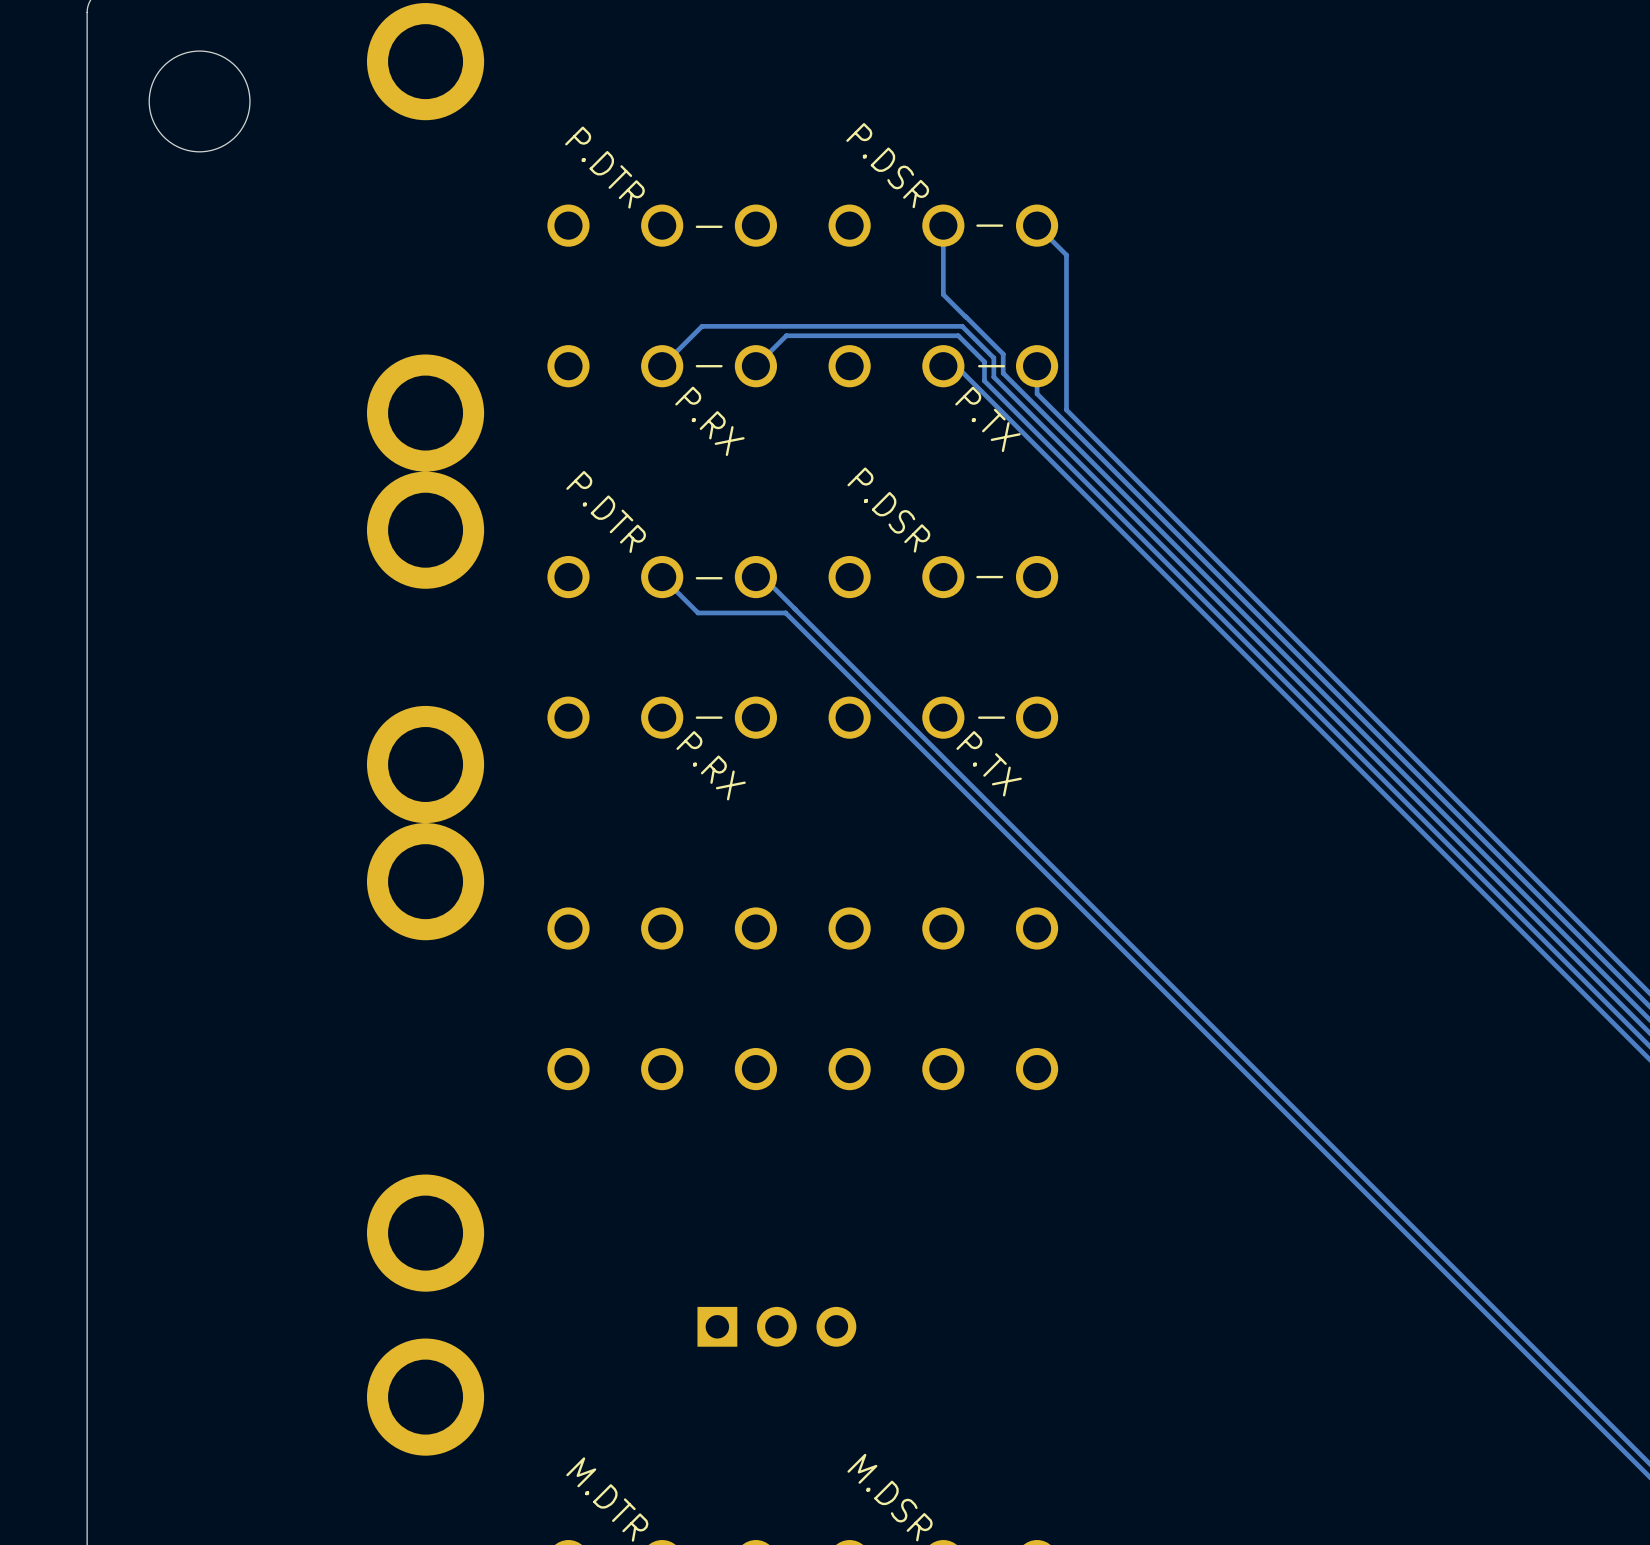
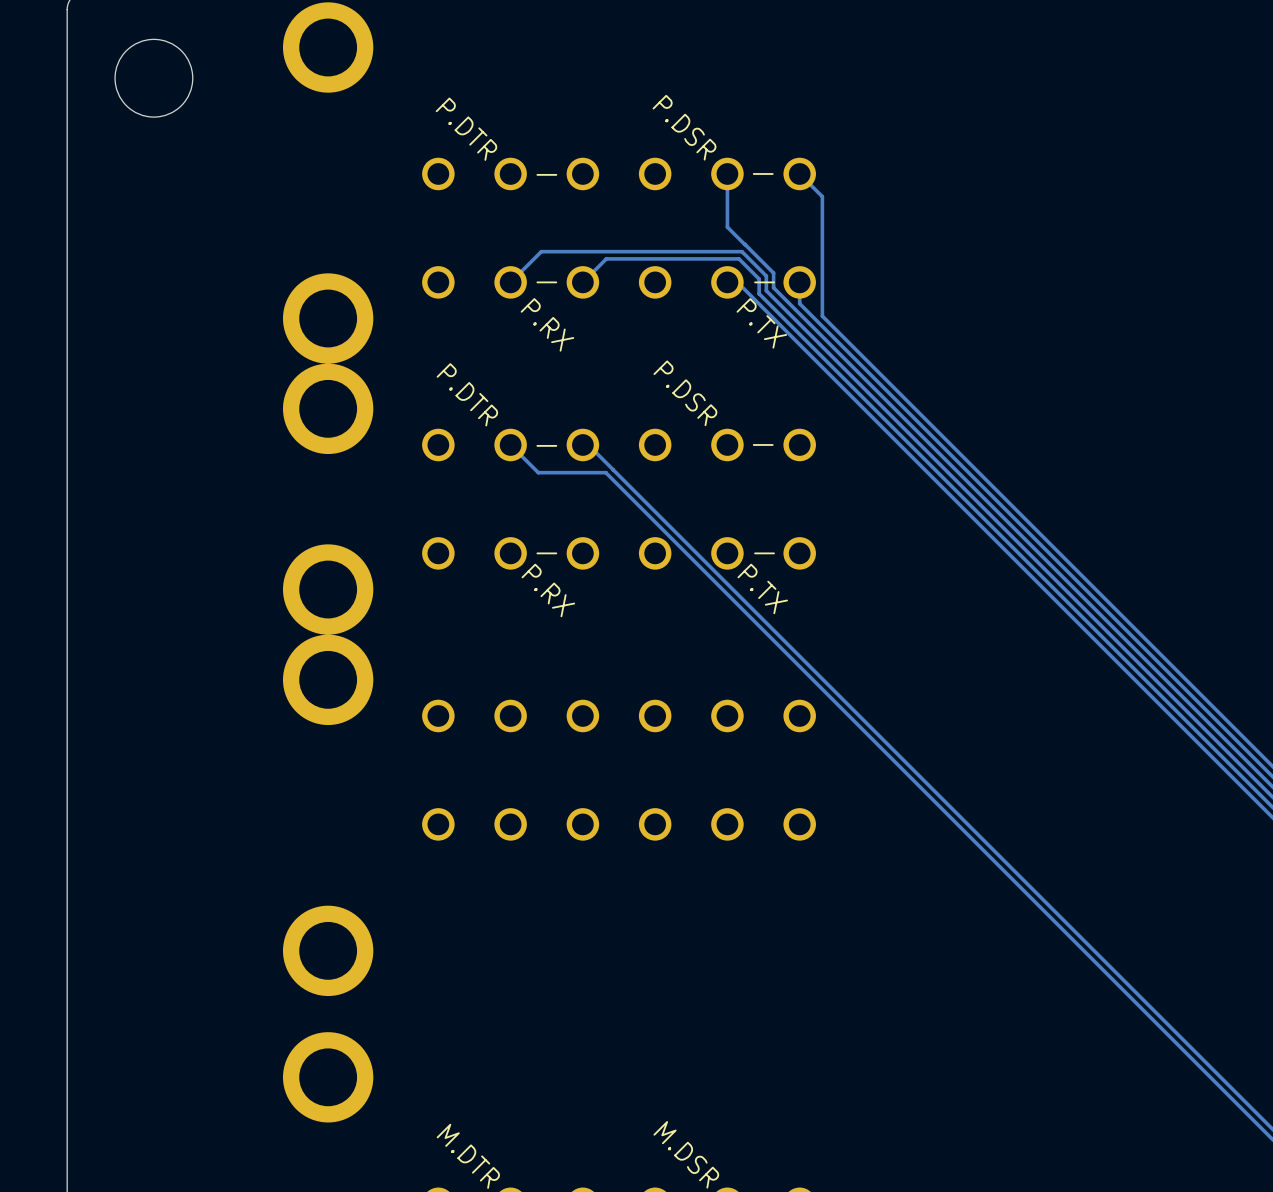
part: (776, 1326) -> none

